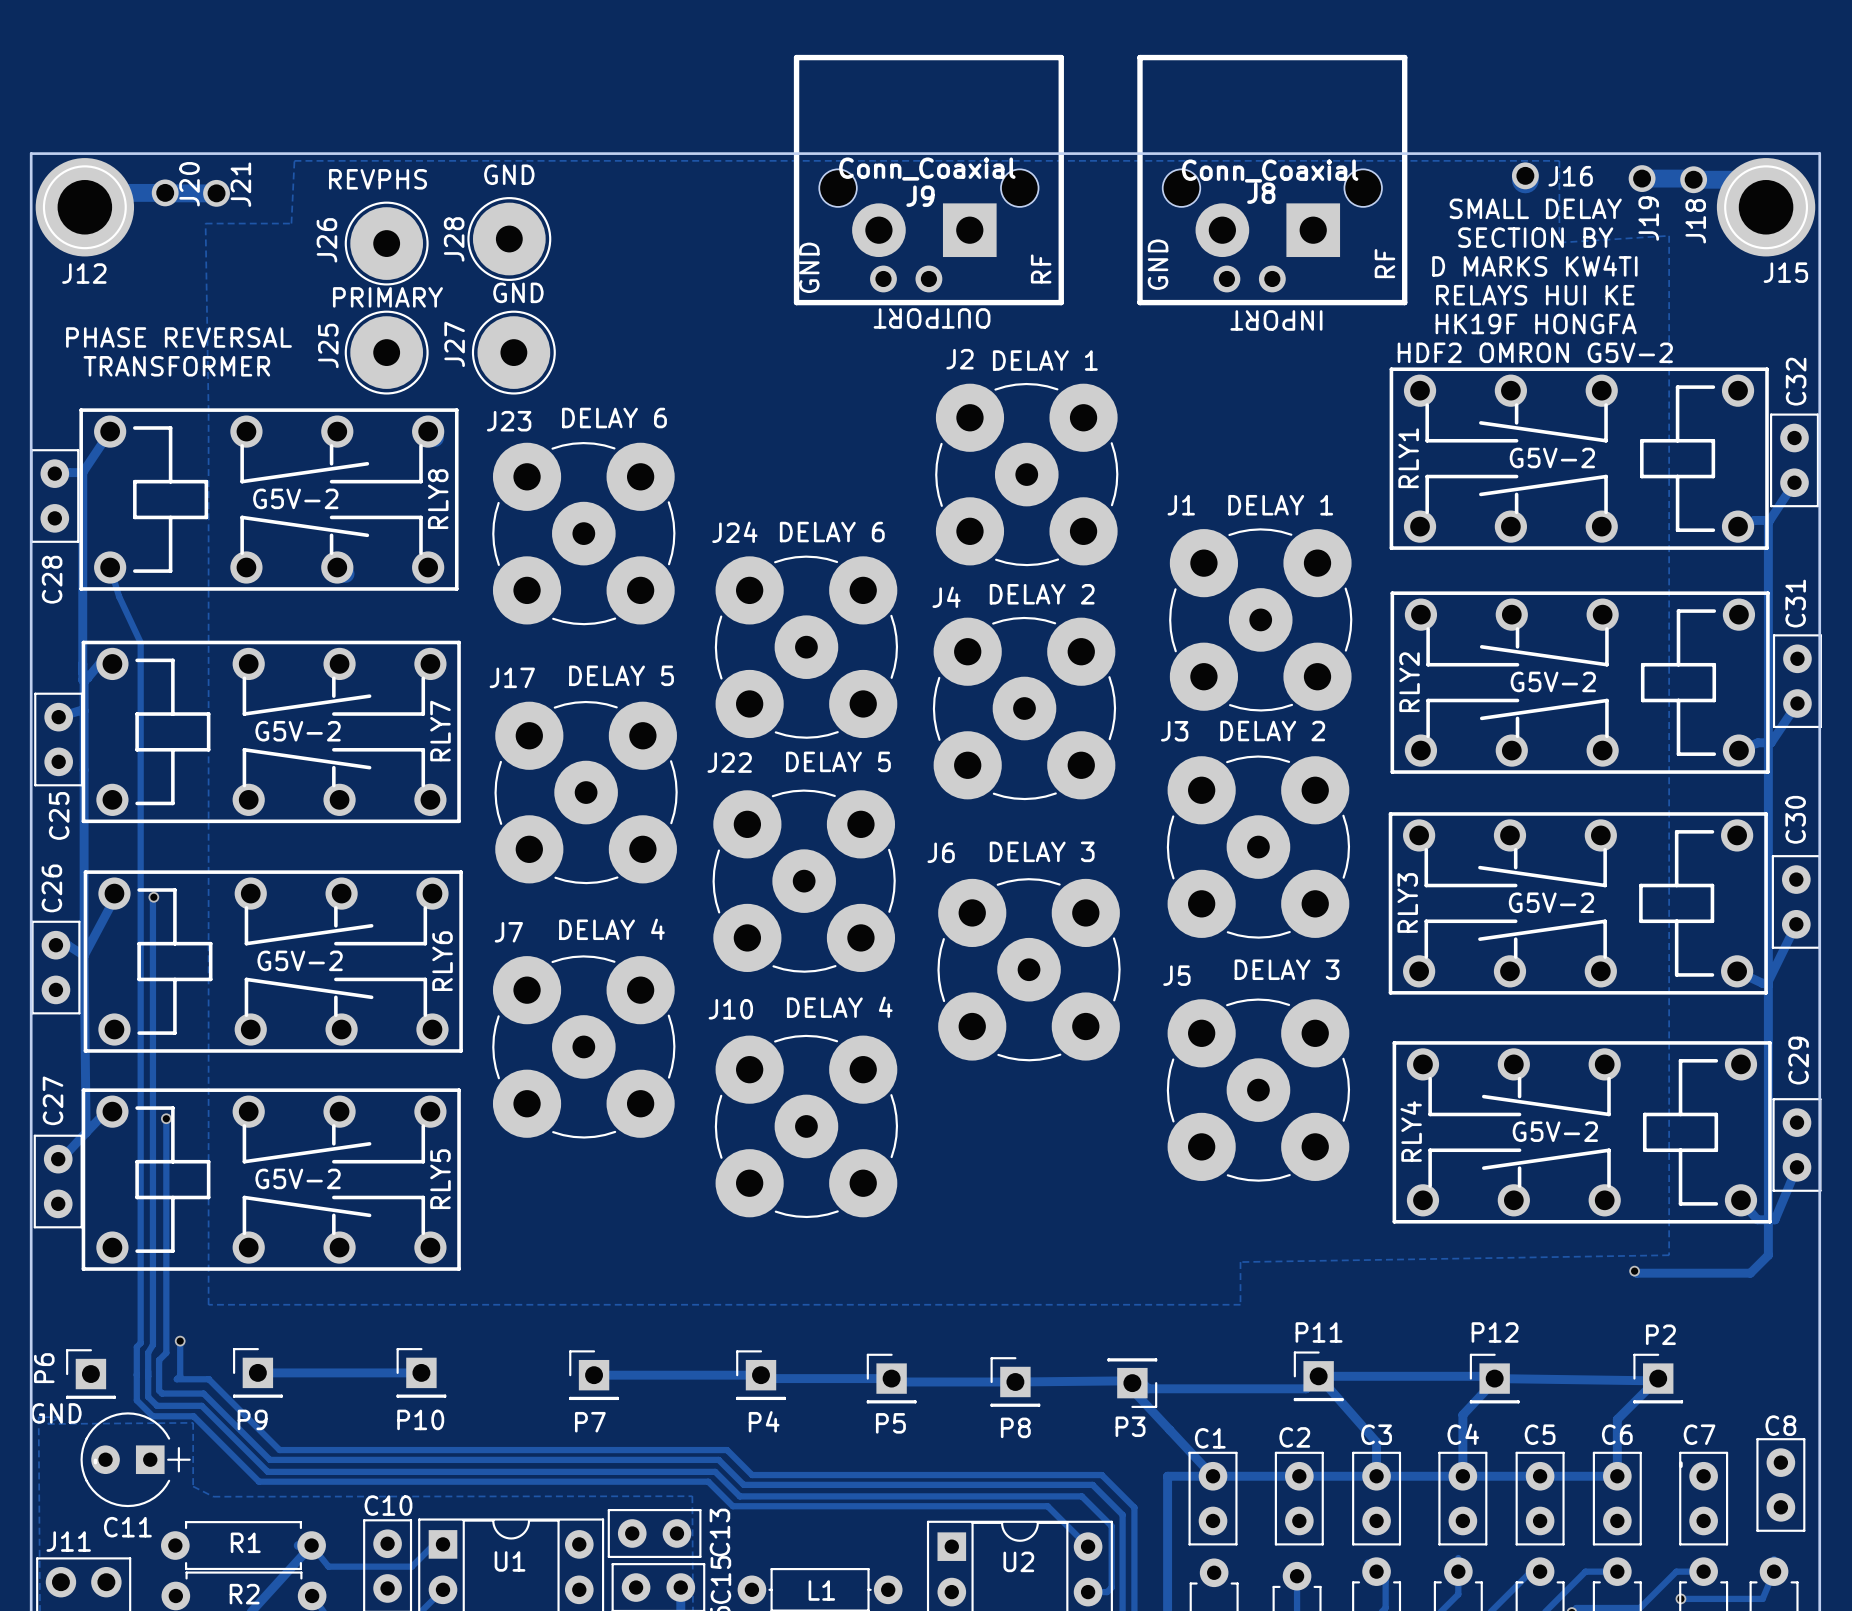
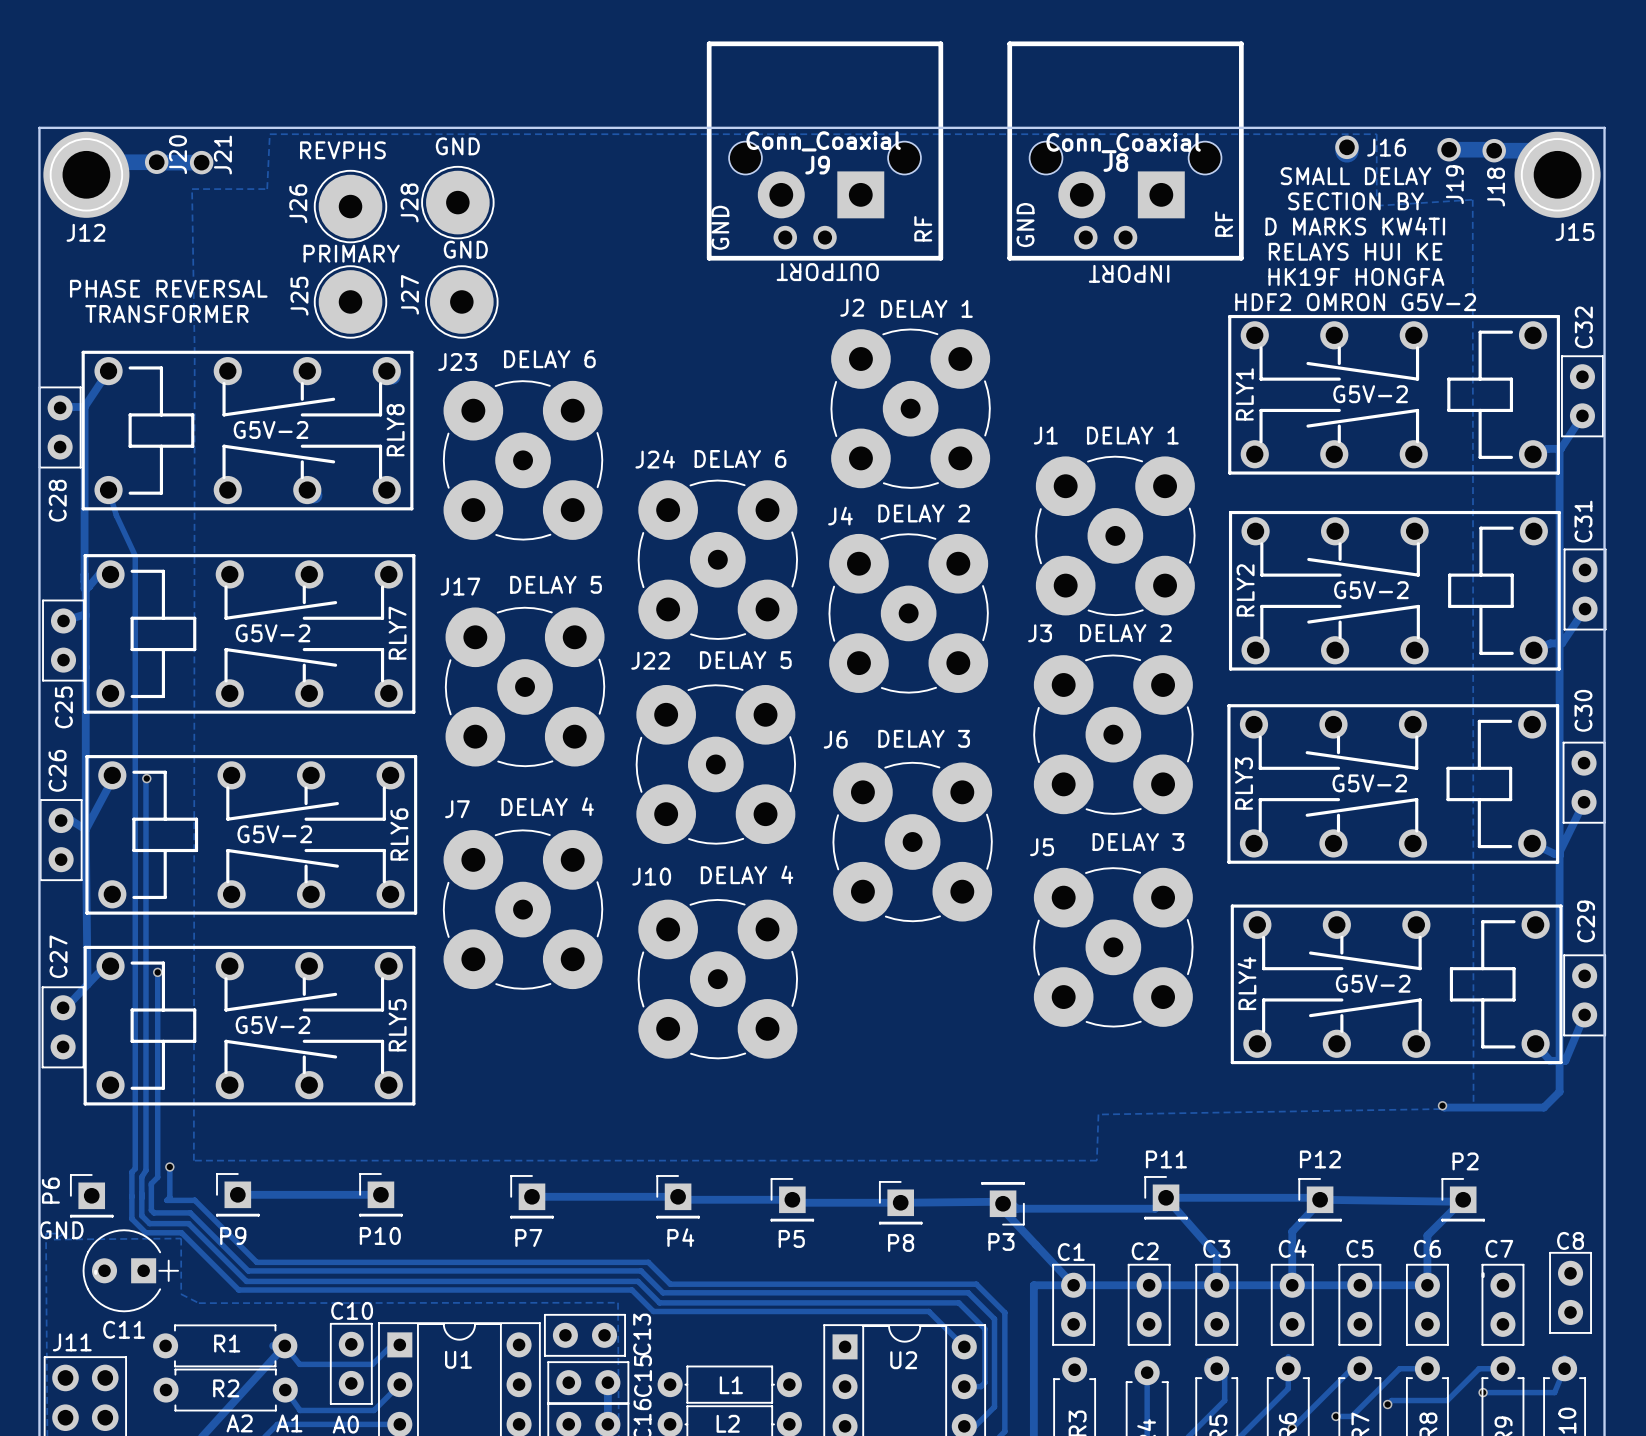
zone outline: (1669, 235) (1669, 1255) (1240, 1262) (1240, 1304) (208, 1304) (208, 412) -> (1472, 199) (1473, 1108) (1098, 1114) (1096, 1160) (193, 1160) (194, 354)

